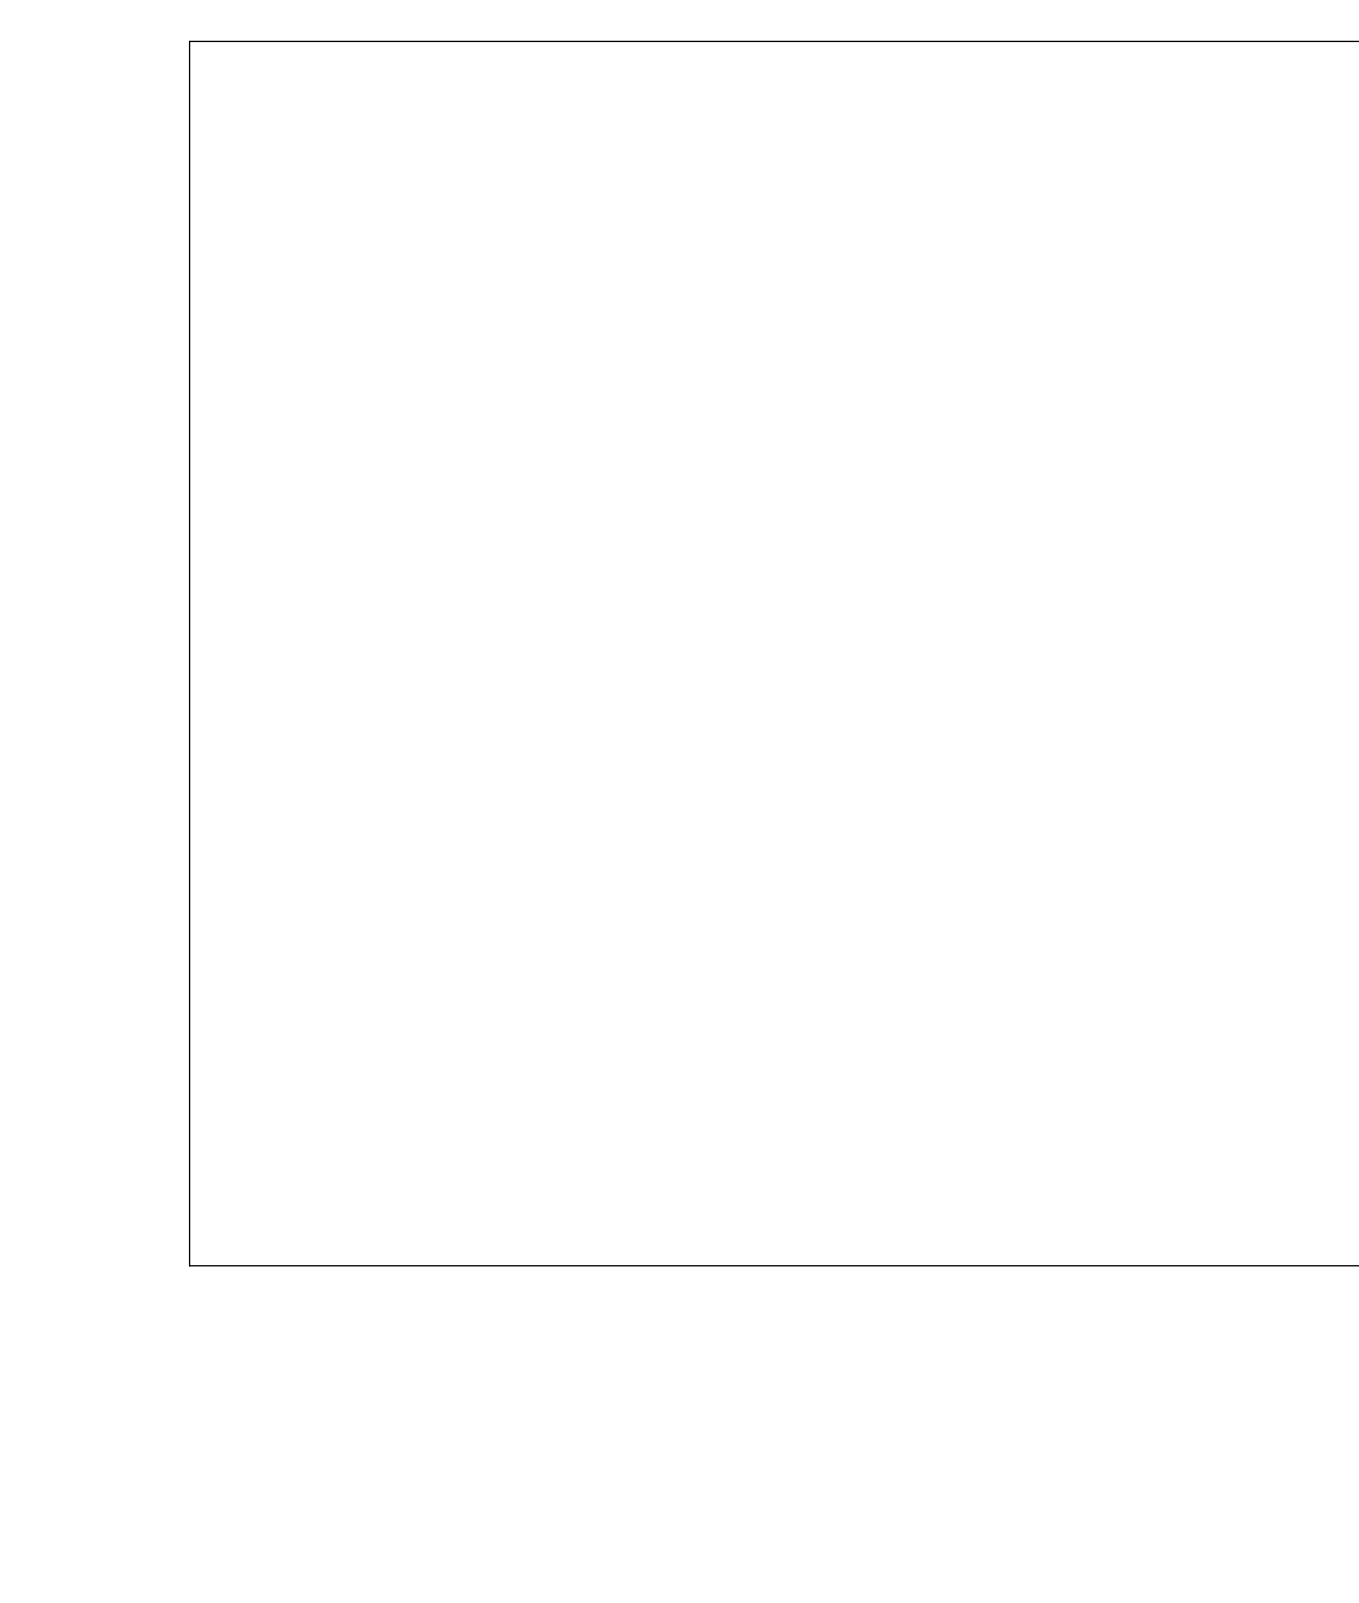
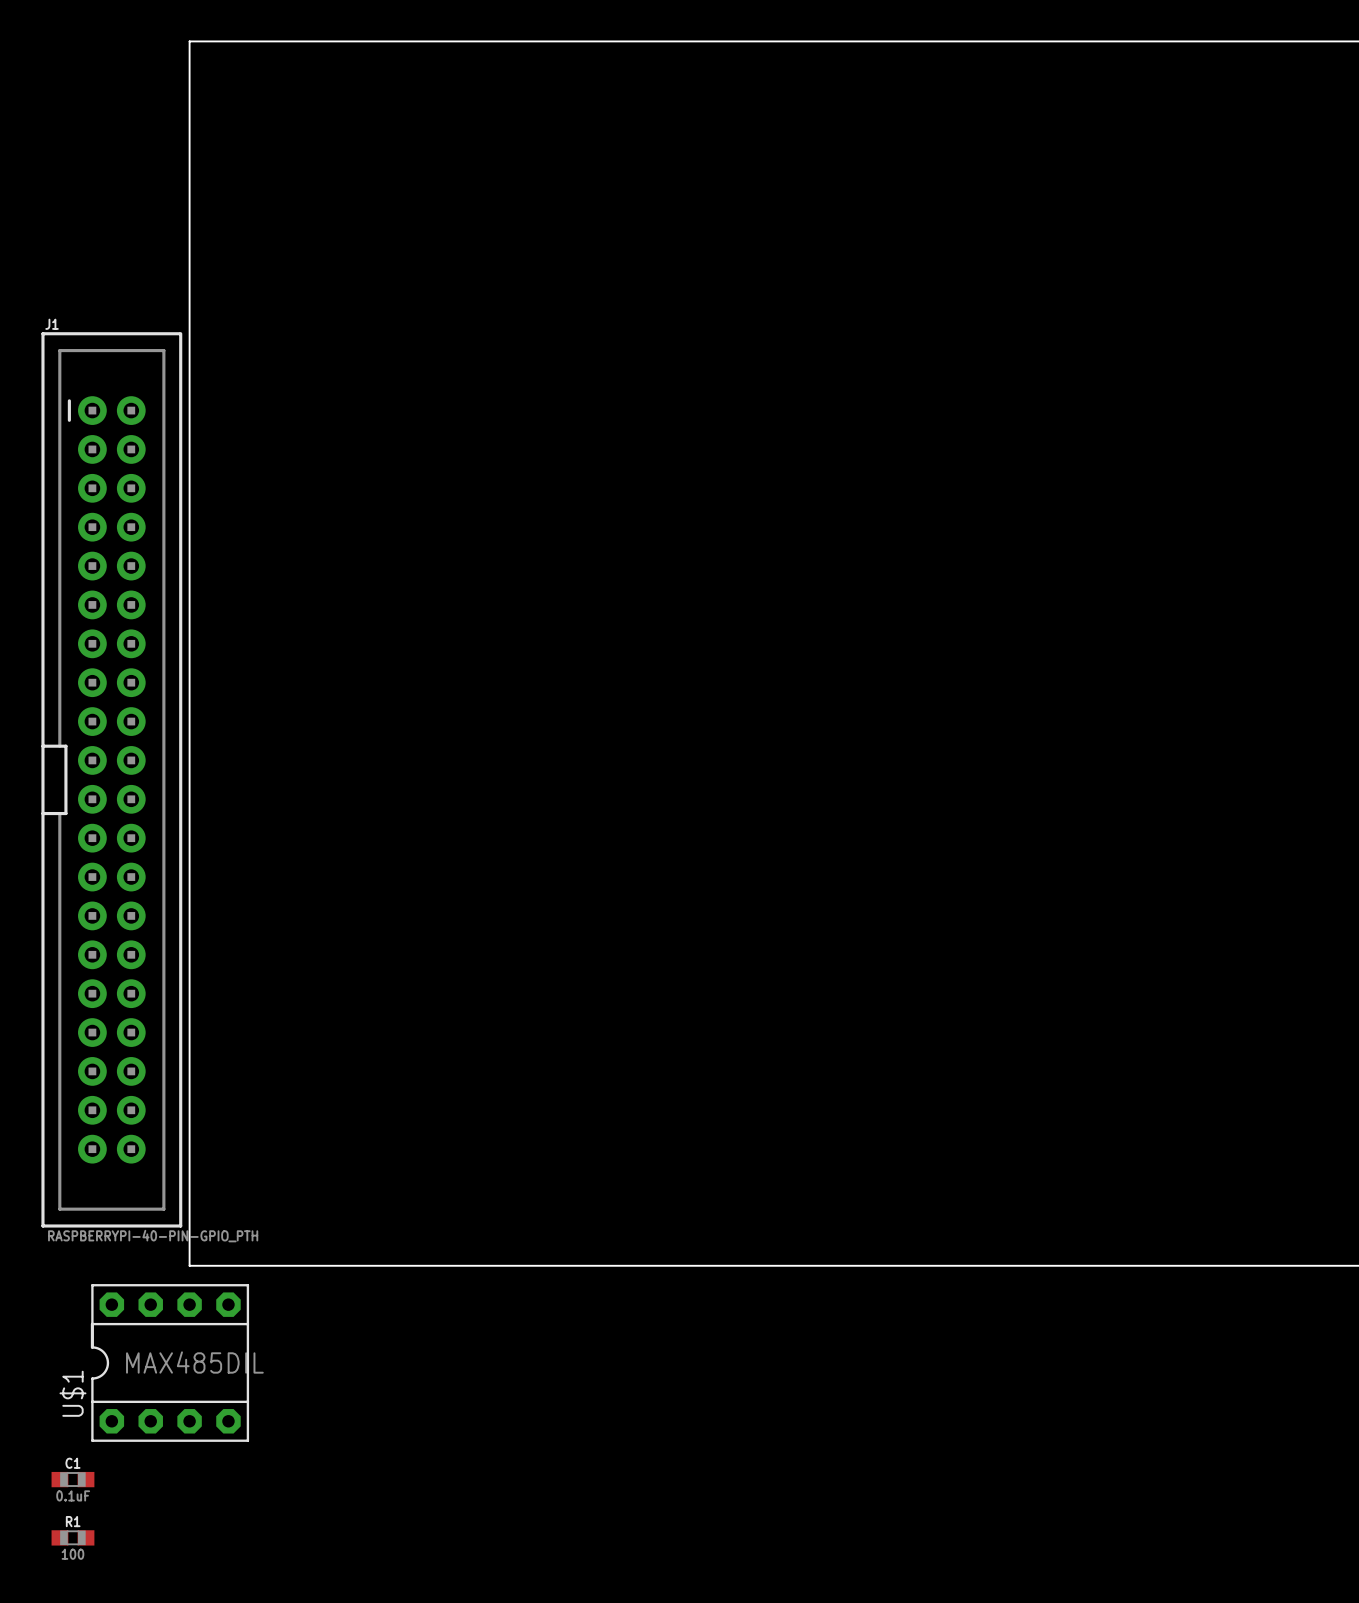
J1: none -> RASPBERRYPI-40-PIN-GPIO_PTH (111, 779)
U$1: none -> MAX485DIL (169, 1362)
C1: none -> 0.1uF (72, 1479)
R1: none -> 100 (72, 1537)

